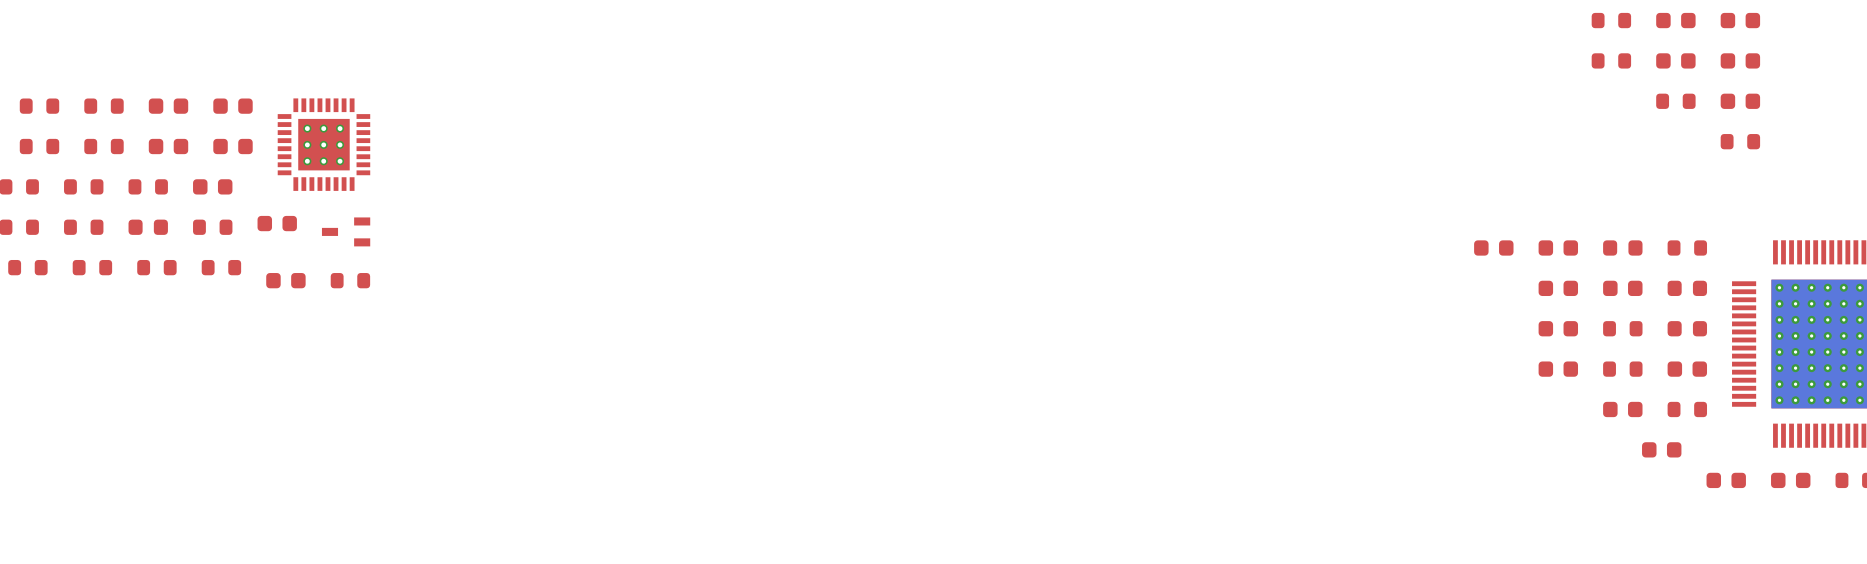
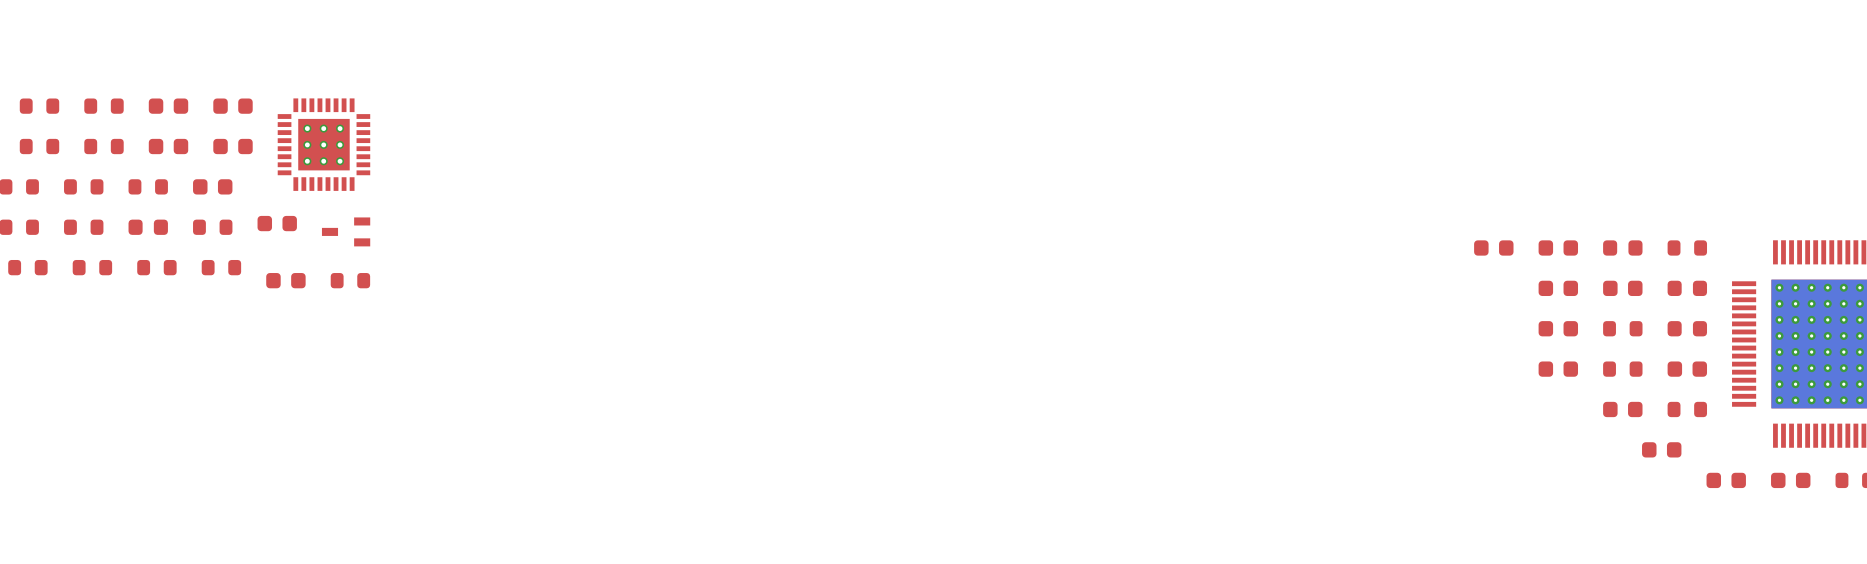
part: (1611, 20) -> none
part: (1675, 20) -> none
part: (1740, 20) -> none
part: (1611, 60) -> none
part: (1675, 60) -> none
part: (1740, 60) -> none
part: (1675, 101) -> none
part: (1740, 101) -> none
part: (1740, 141) -> none

